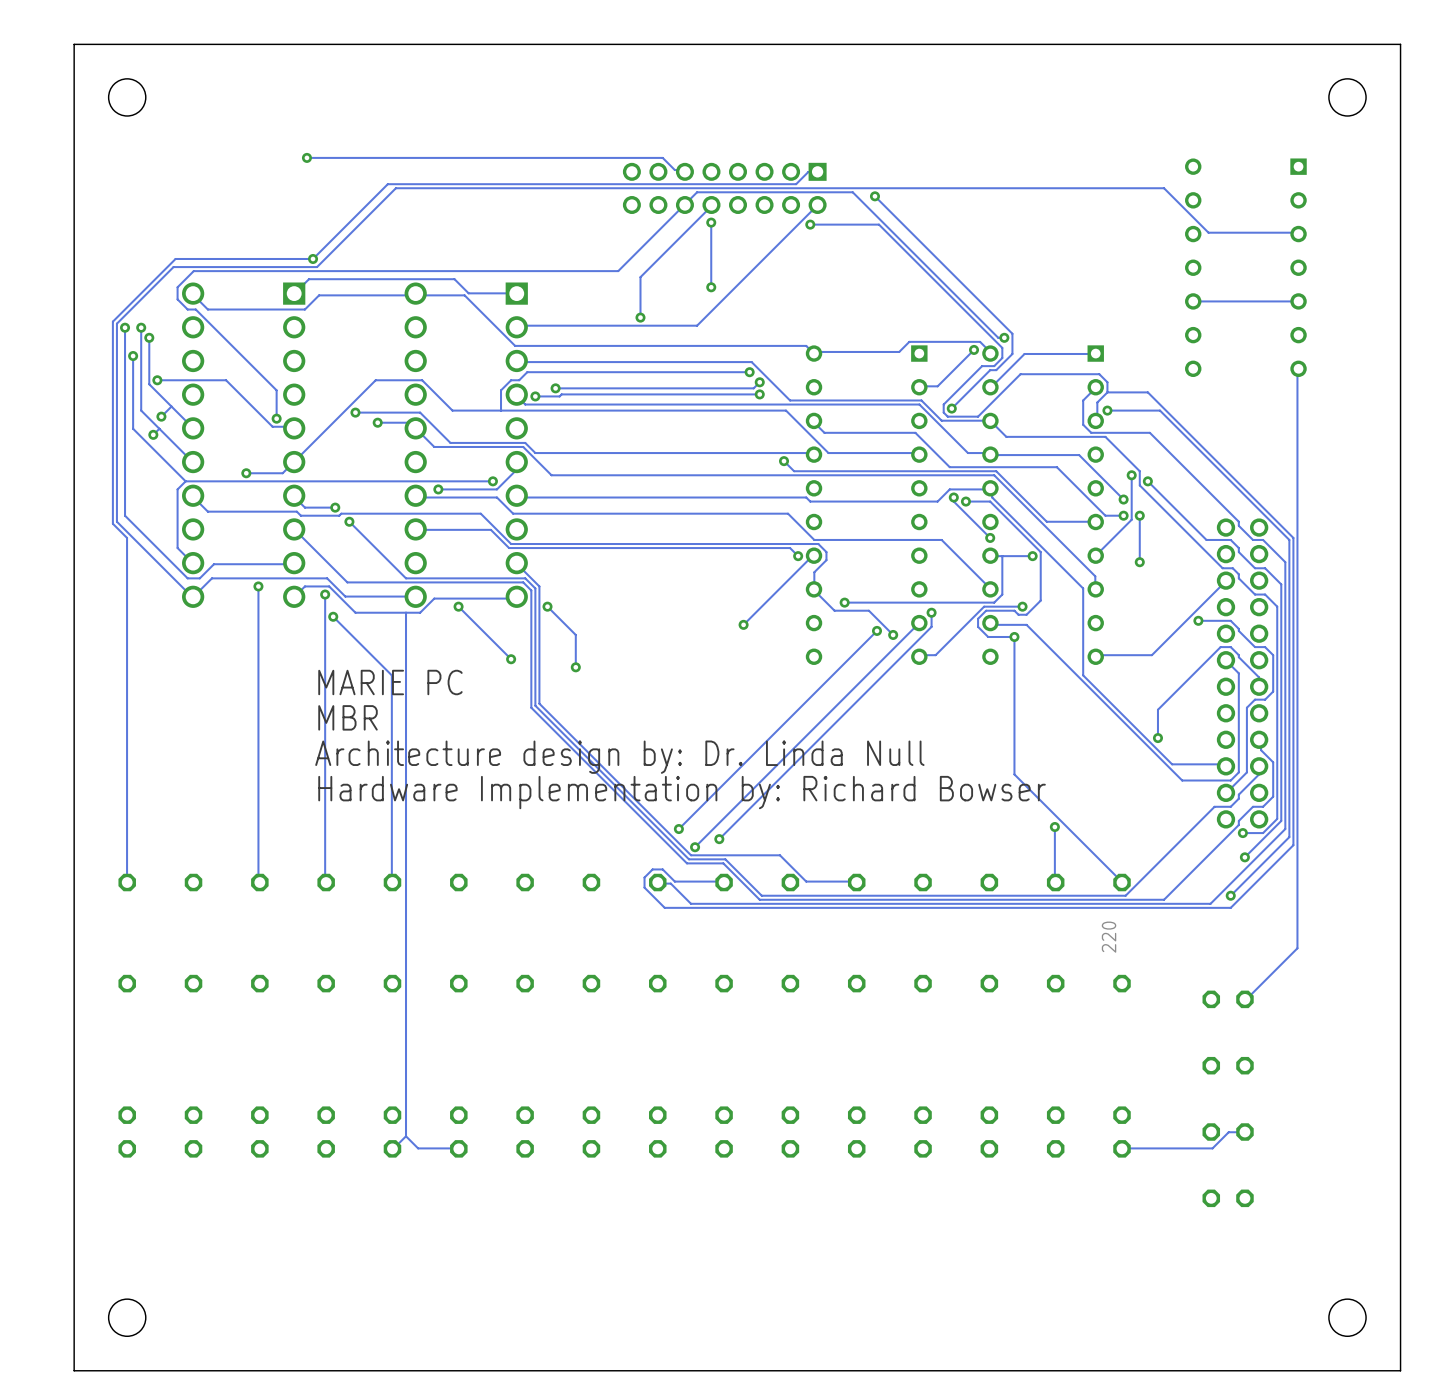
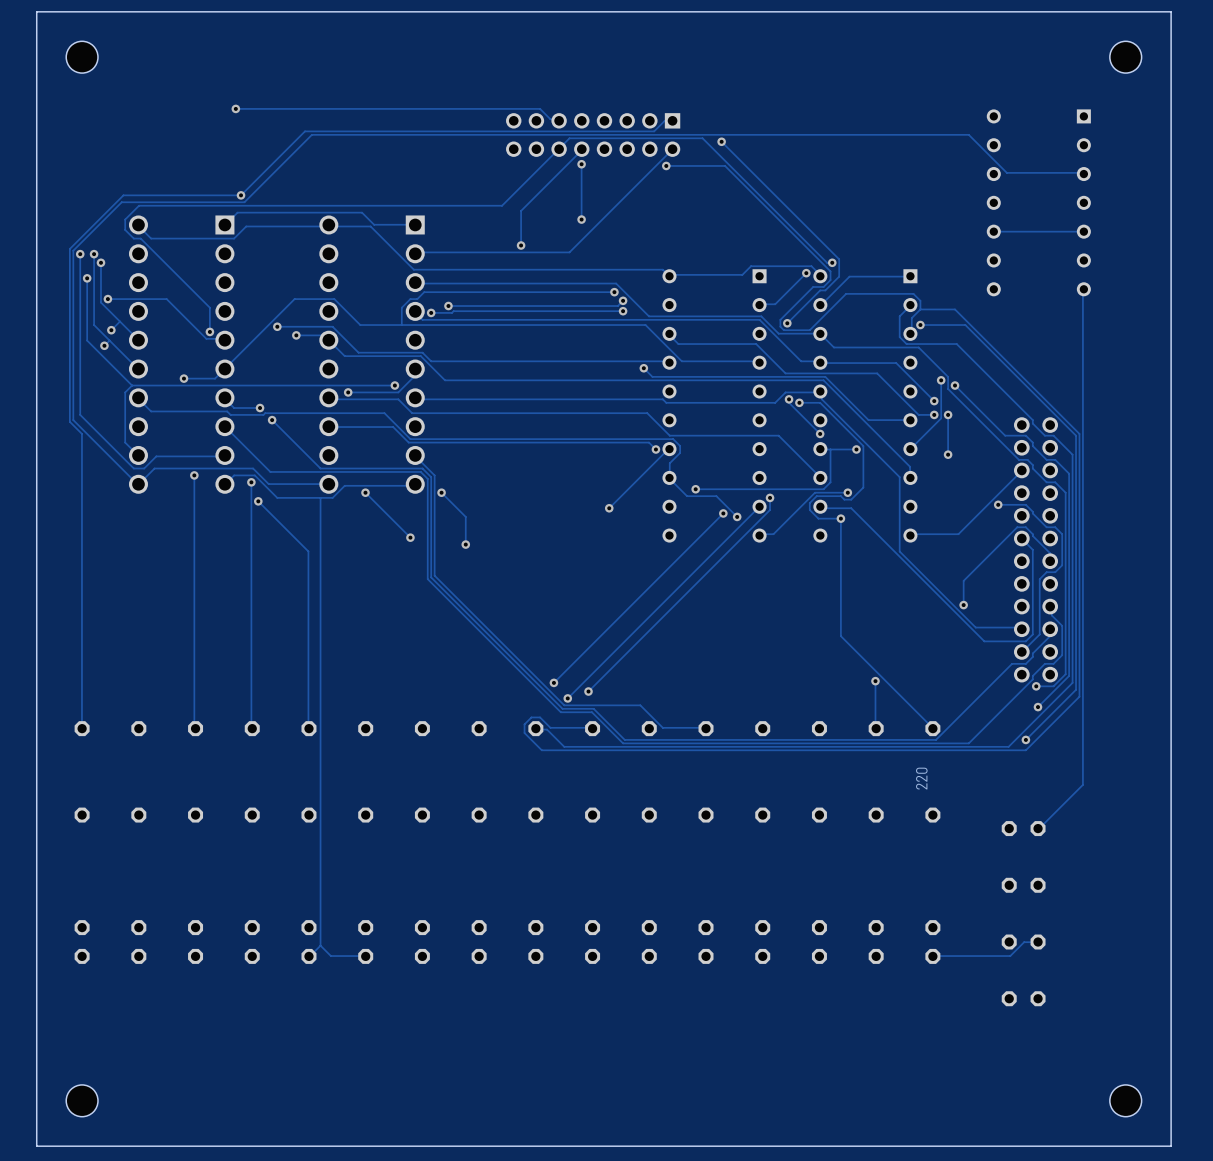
text: MARIE PC (390, 682) -> none
text: MBR (348, 717) -> none
text: Architecture design by: Dr. Linda Null (619, 757) -> none
text: Hardware Implementation by: Richard Bowser (682, 792) -> none

